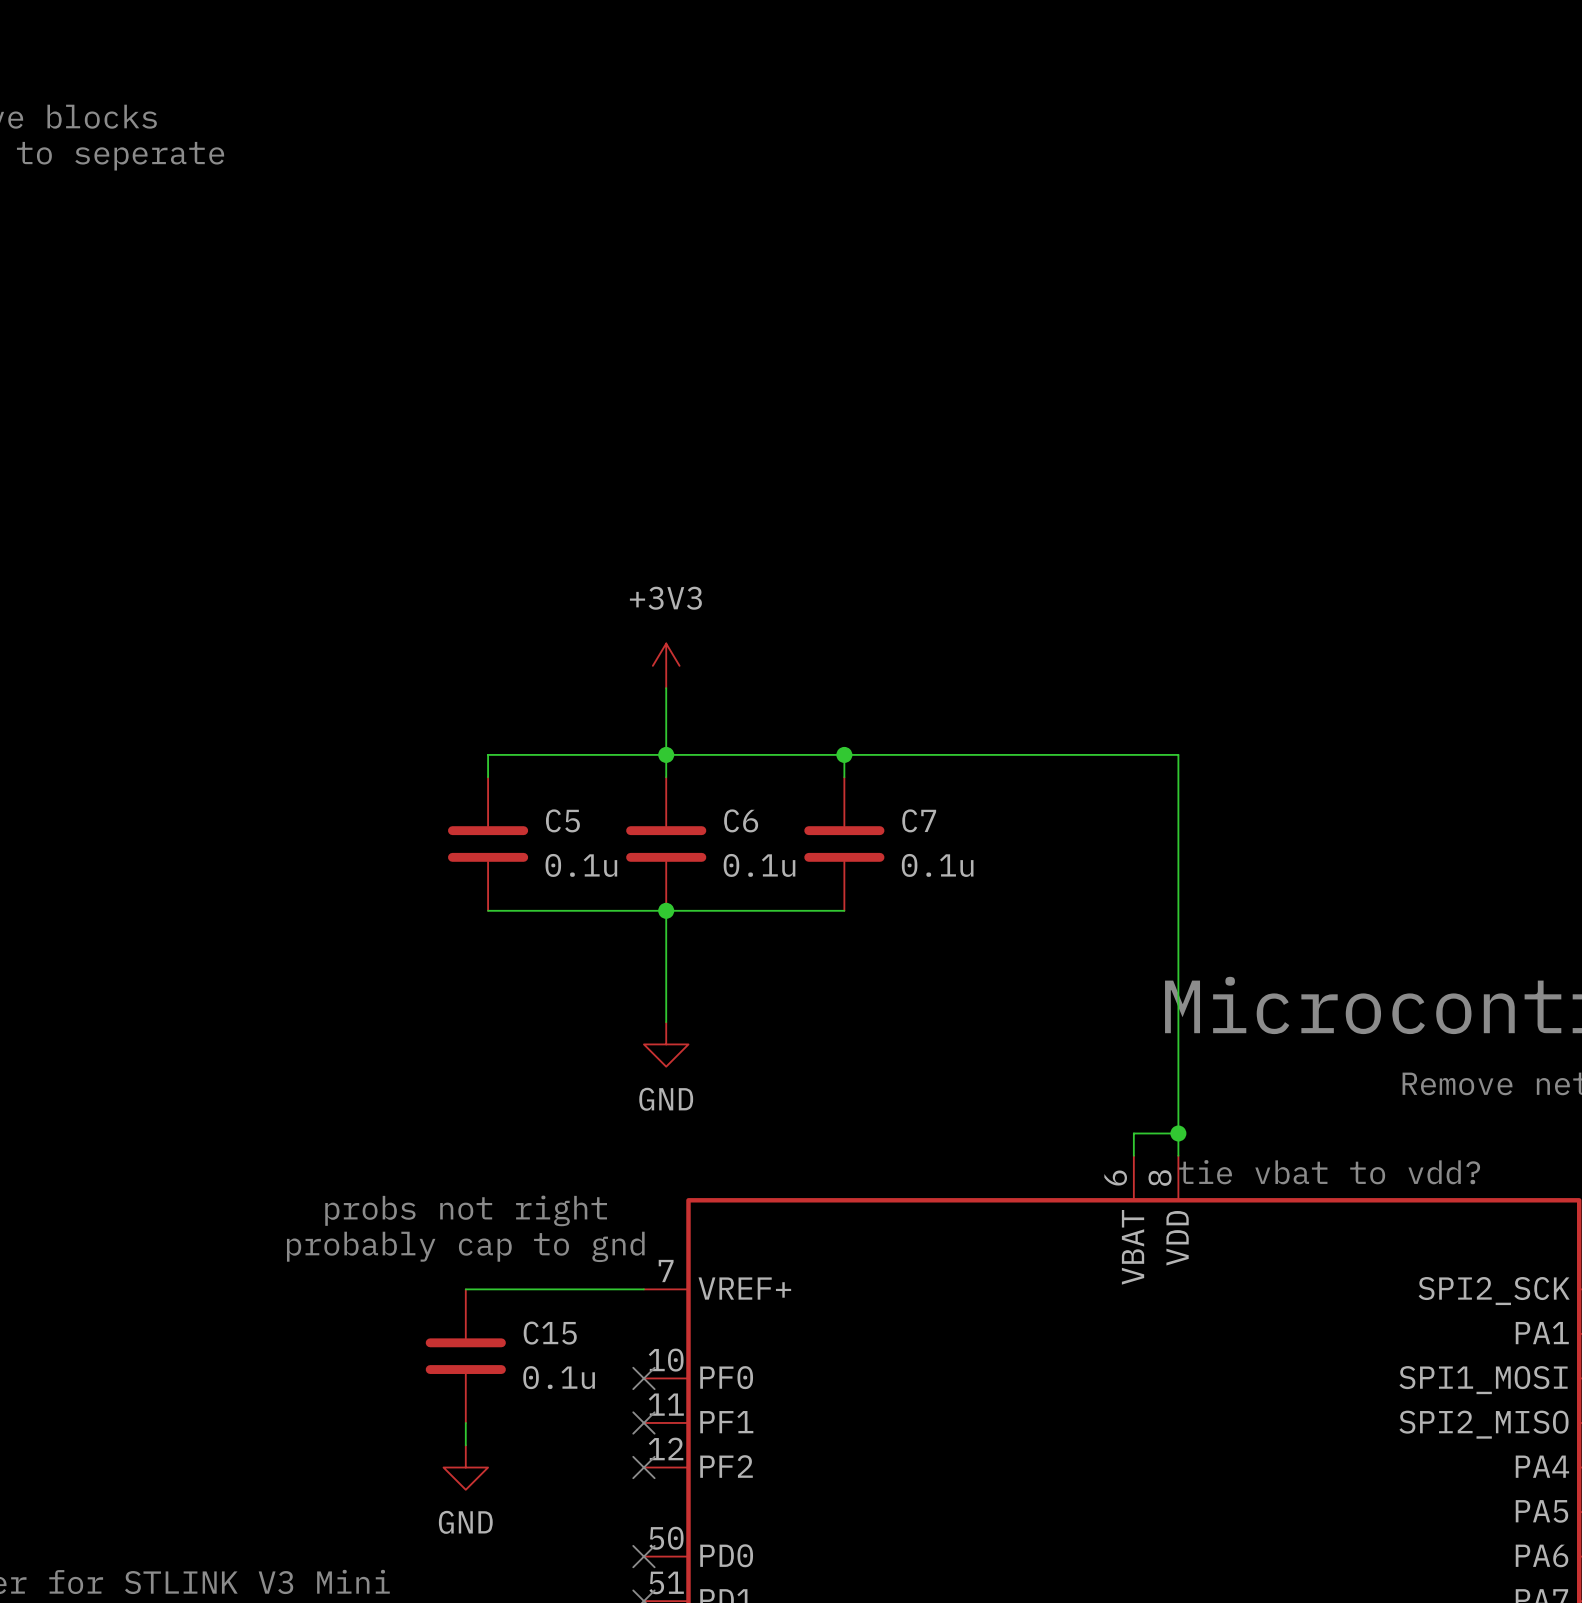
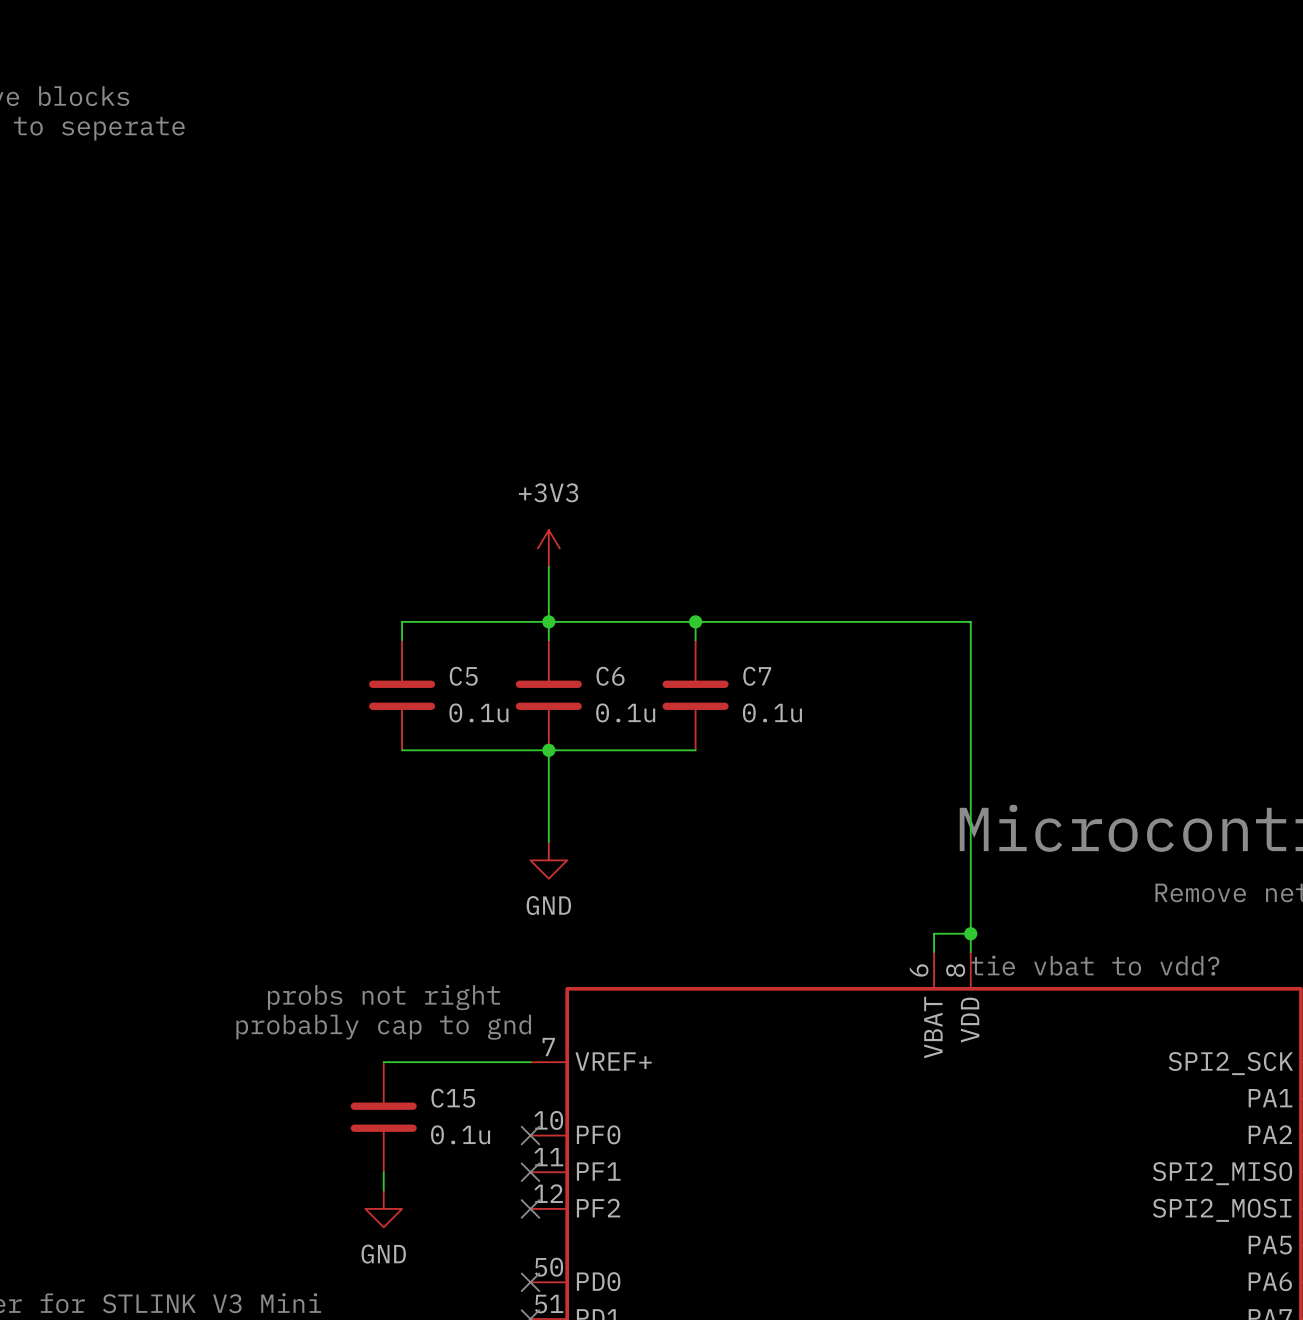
part pin name: SPI1_MOSI (1483, 1380) -> PA2 (1270, 1134)
part pin name: PA4 (1542, 1466) -> SPI2_MOSI (1222, 1210)

